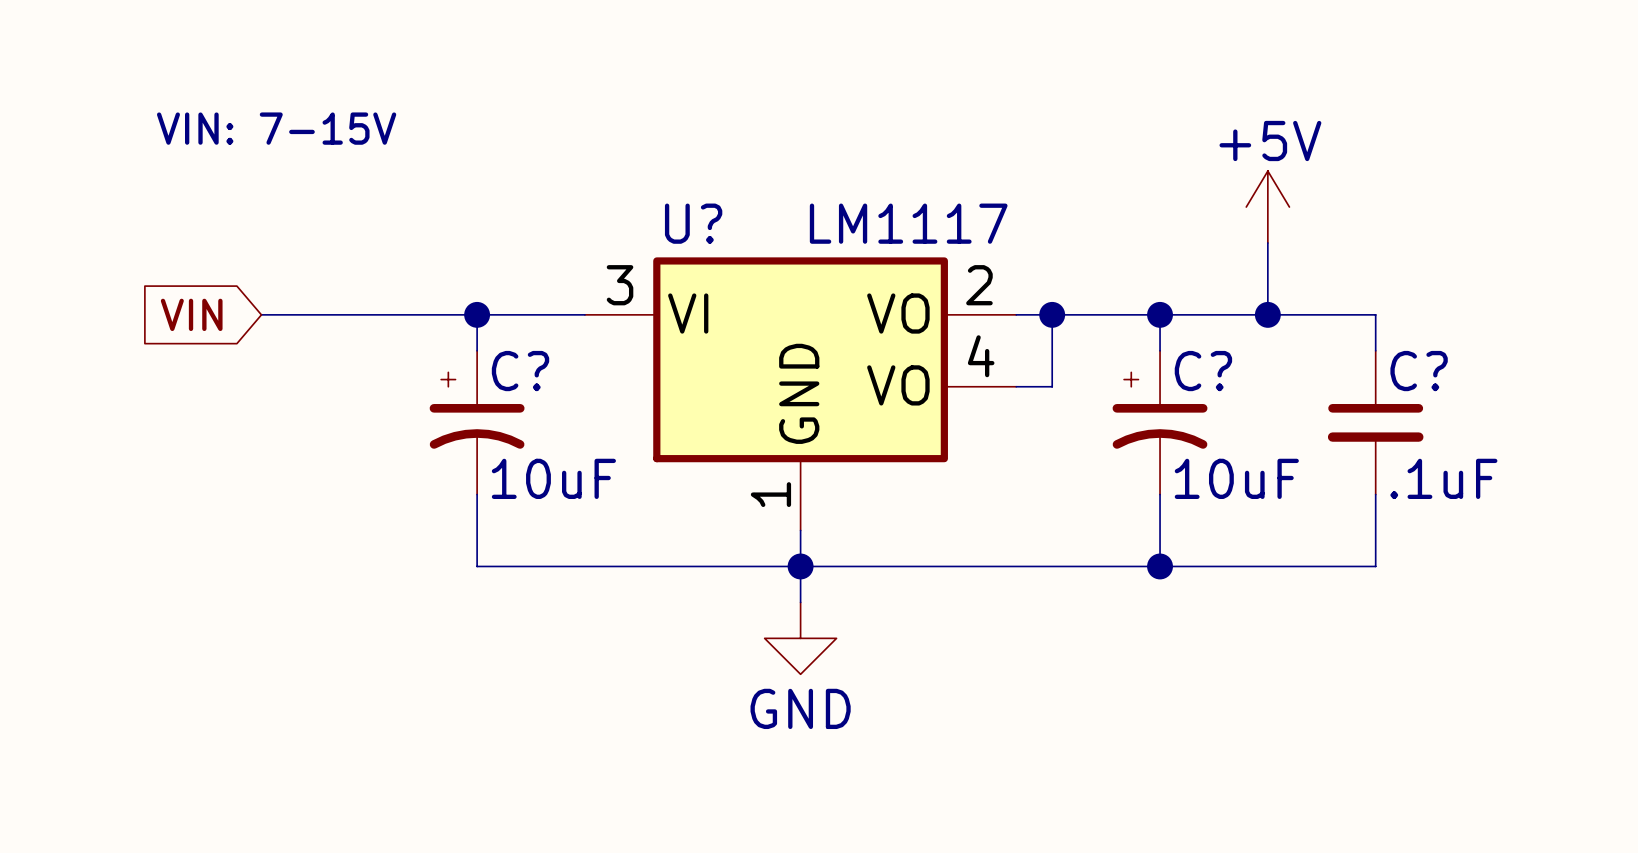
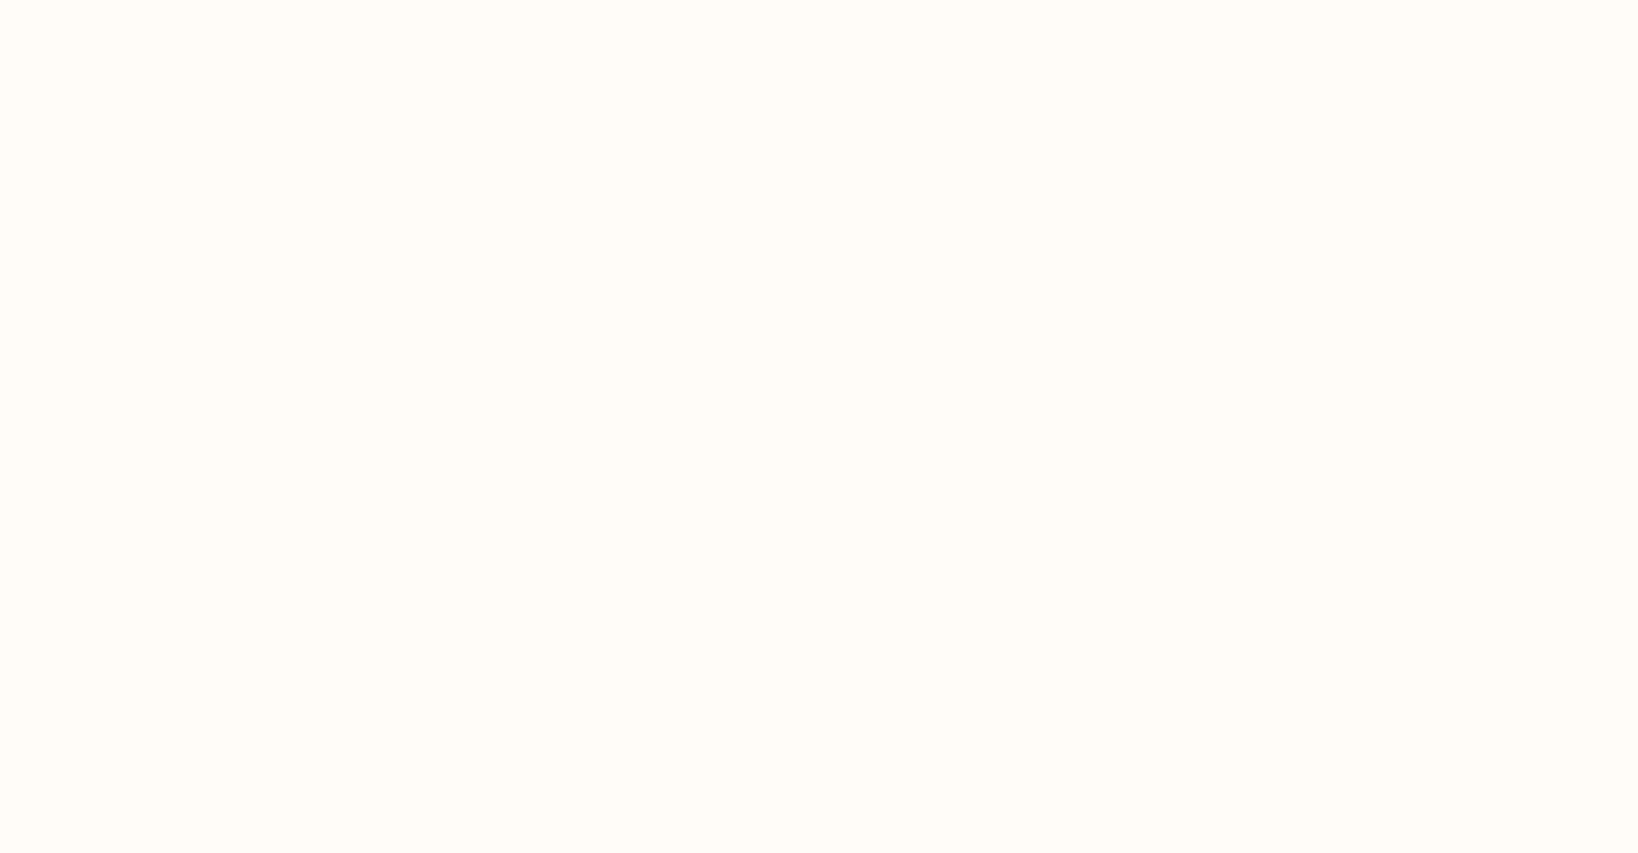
text: VIN: 7-15V (276, 128) -> none
power symbol: +5V (1267, 207) -> none
wire: (1267, 242) (1267, 314) -> none
global label: VIN (191, 314) -> none
wire: (261, 314) (584, 314) -> none
wire: (477, 314) (477, 350) -> none
junction: (477, 314) -> none
wire: (1016, 314) (1375, 314) (1375, 350) -> none
wire: (1052, 314) (1052, 386) (1016, 386) -> none
junction: (1052, 314) -> none
wire: (1160, 314) (1160, 350) -> none
junction: (1160, 314) -> none
junction: (1267, 314) -> none
U?: LM1117 (800, 393) -> none
C?: 10uF (477, 422) -> none
C?: 10uF (1160, 422) -> none
C?: .1uF (1375, 422) -> none
wire: (477, 494) (477, 566) (1375, 566) (1375, 494) -> none
wire: (1160, 494) (1160, 566) -> none
wire: (800, 530) (800, 602) -> none
junction: (800, 566) -> none
junction: (1160, 566) -> none
power symbol: GND (800, 638) -> none

